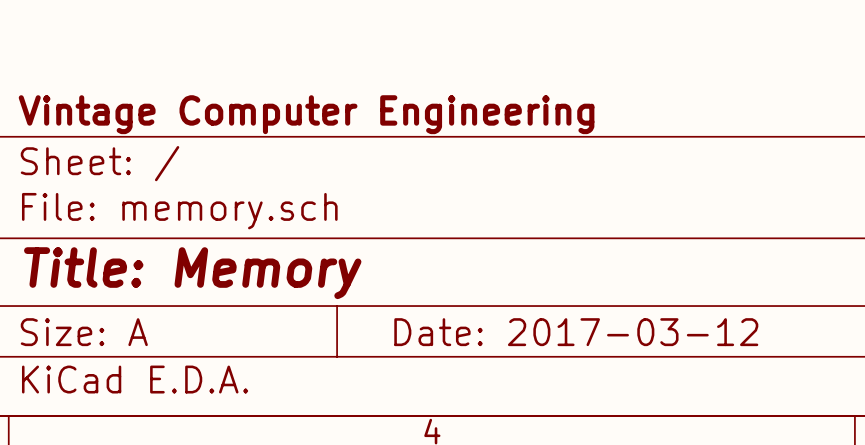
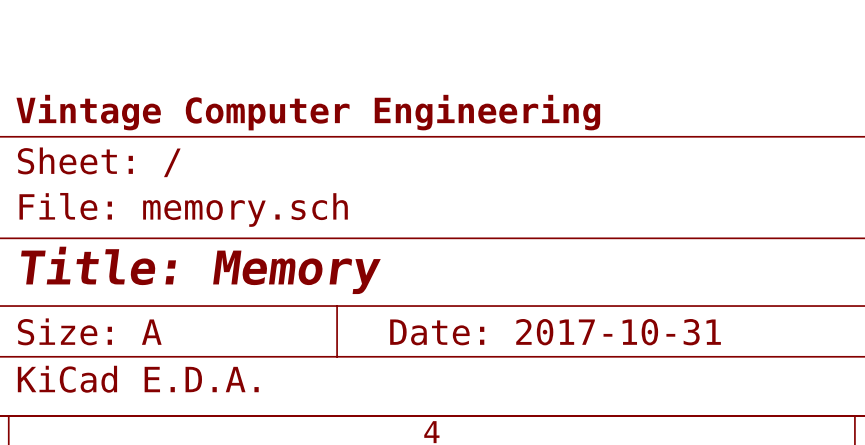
title block: Date: 2017-03-12 (576, 332) -> Date: 2017-10-31 (555, 332)

